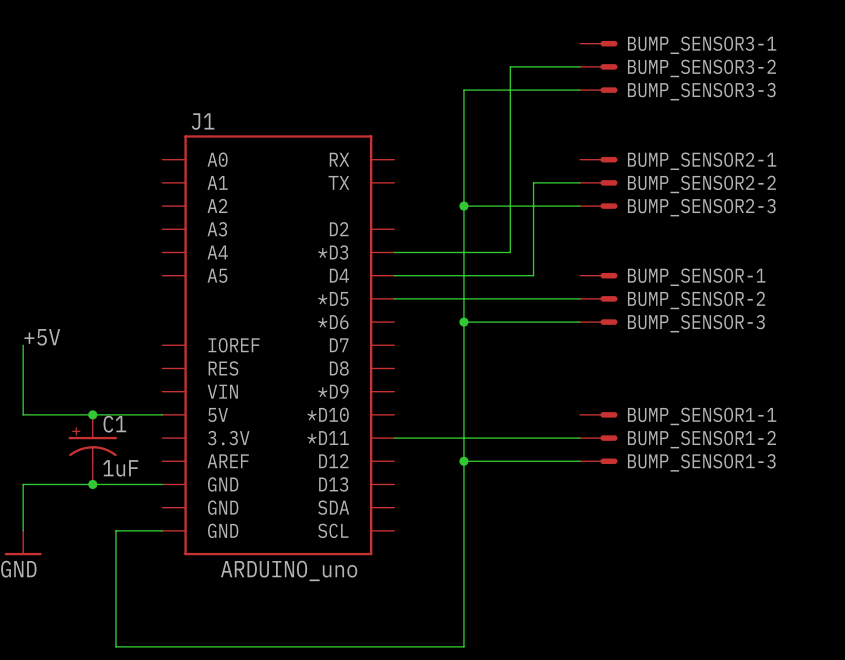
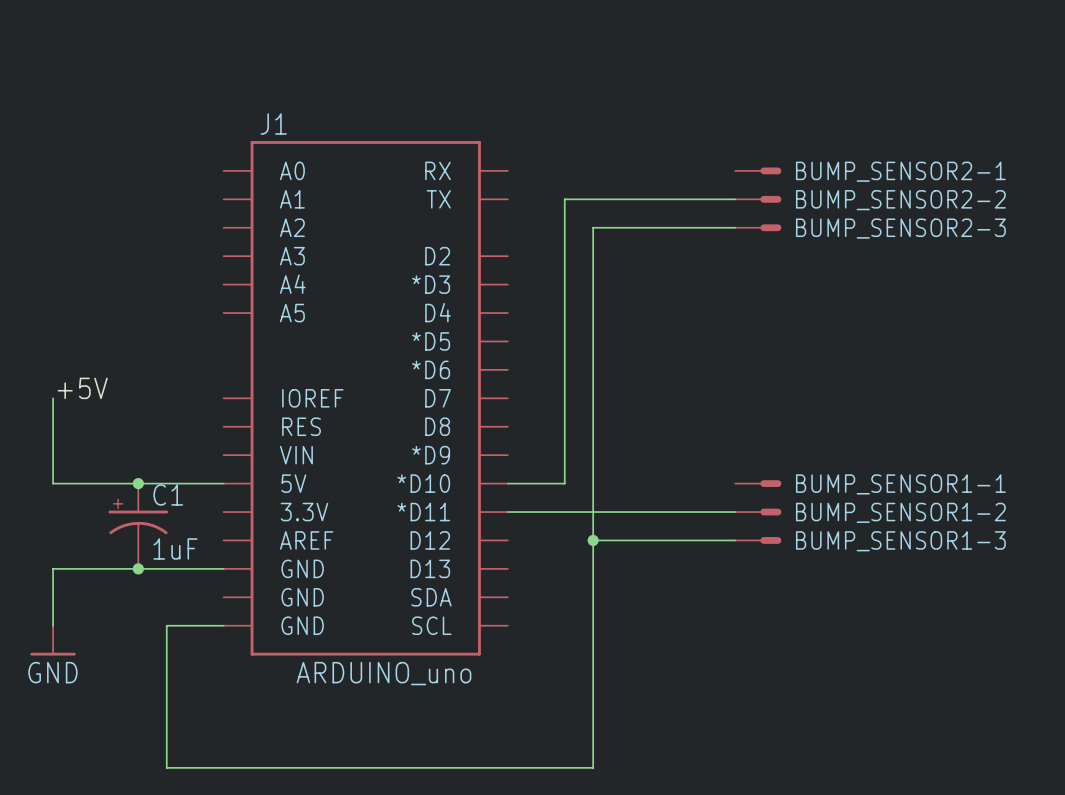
BUMP_SENSOR3-1: (598, 43) -> none
wire: (579, 66) (510, 66) (510, 252) (394, 252) -> none
BUMP_SENSOR3-2: (598, 66) -> none
wire: (579, 90) (463, 90) (463, 206) -> none
BUMP_SENSOR3-3: (598, 90) -> none
wire: (533, 182) (533, 275) (394, 275) -> (678, 199) (564, 199) (564, 483) (507, 483)
junction: (463, 206) -> none
BUMP_SENSOR-1: (598, 275) -> none
wire: (394, 298) (579, 298) -> none
BUMP_SENSOR-2: (598, 298) -> none
wire: (463, 322) (579, 322) -> none
junction: (463, 322) -> none
BUMP_SENSOR-3: (598, 322) -> none

